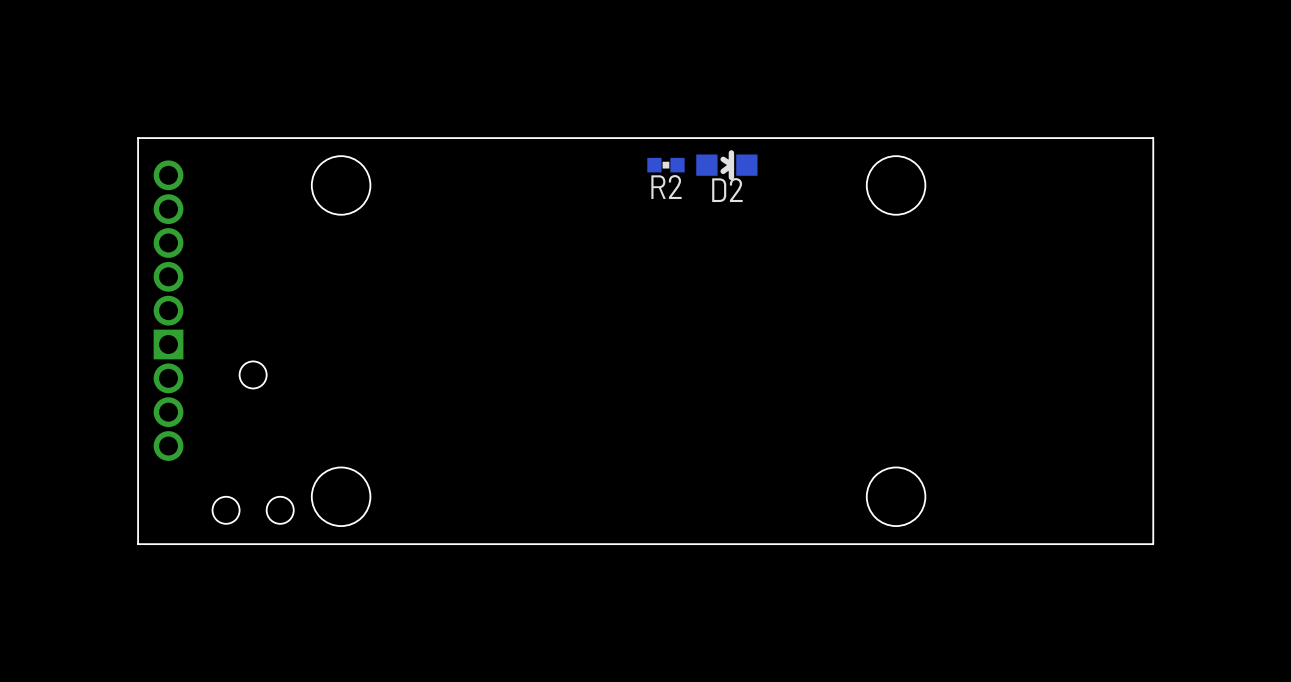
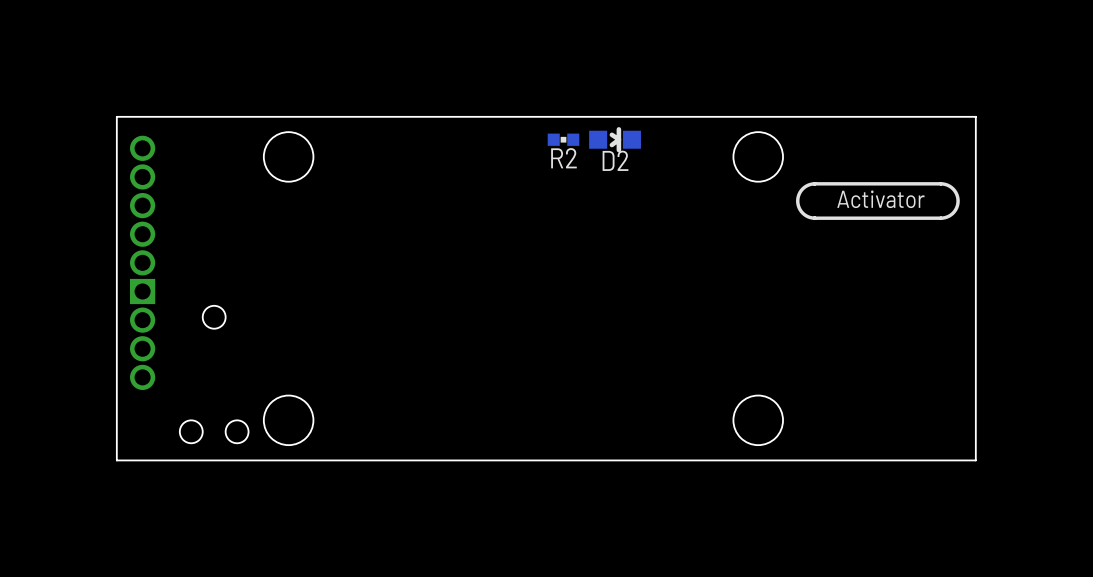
line: none -> (814, 183) (943, 183) (954, 190) (958, 201) (954, 211) (943, 218) (814, 218)
line: none -> (814, 183) (802, 188) (797, 201) (802, 213) (814, 218)
text: none -> Activator (880, 199)

